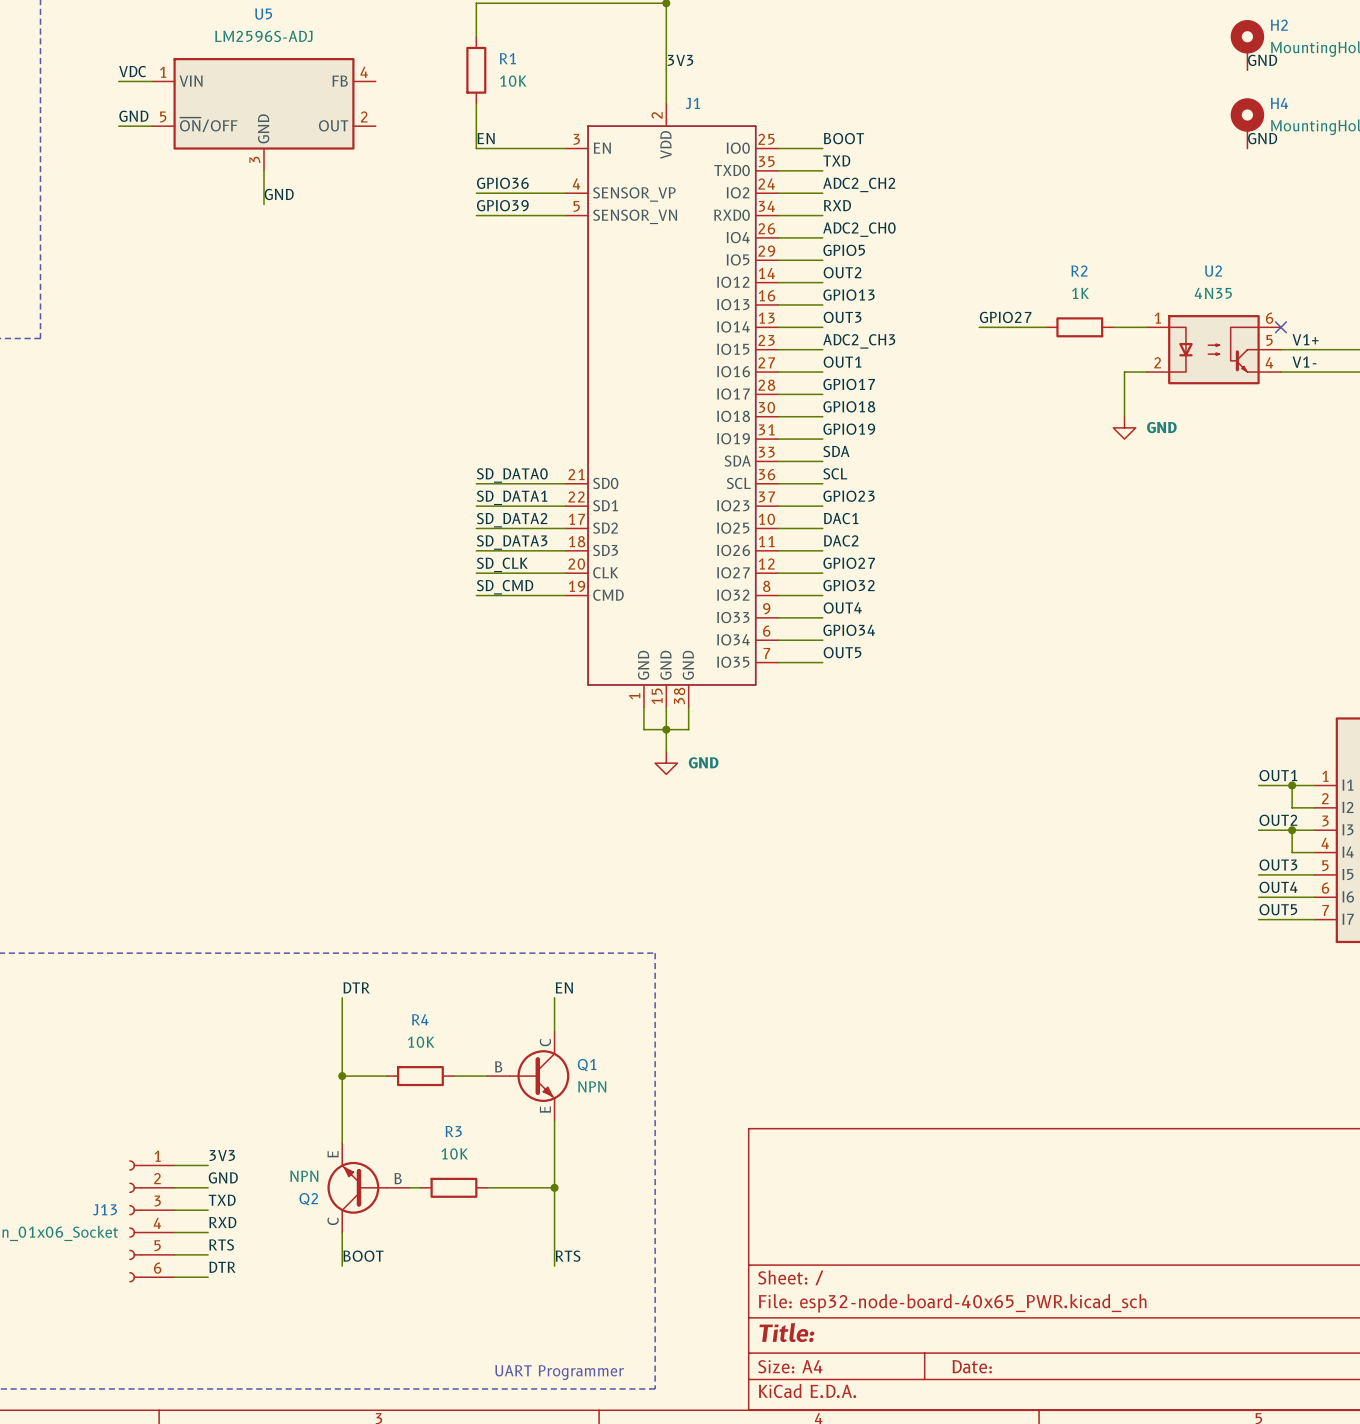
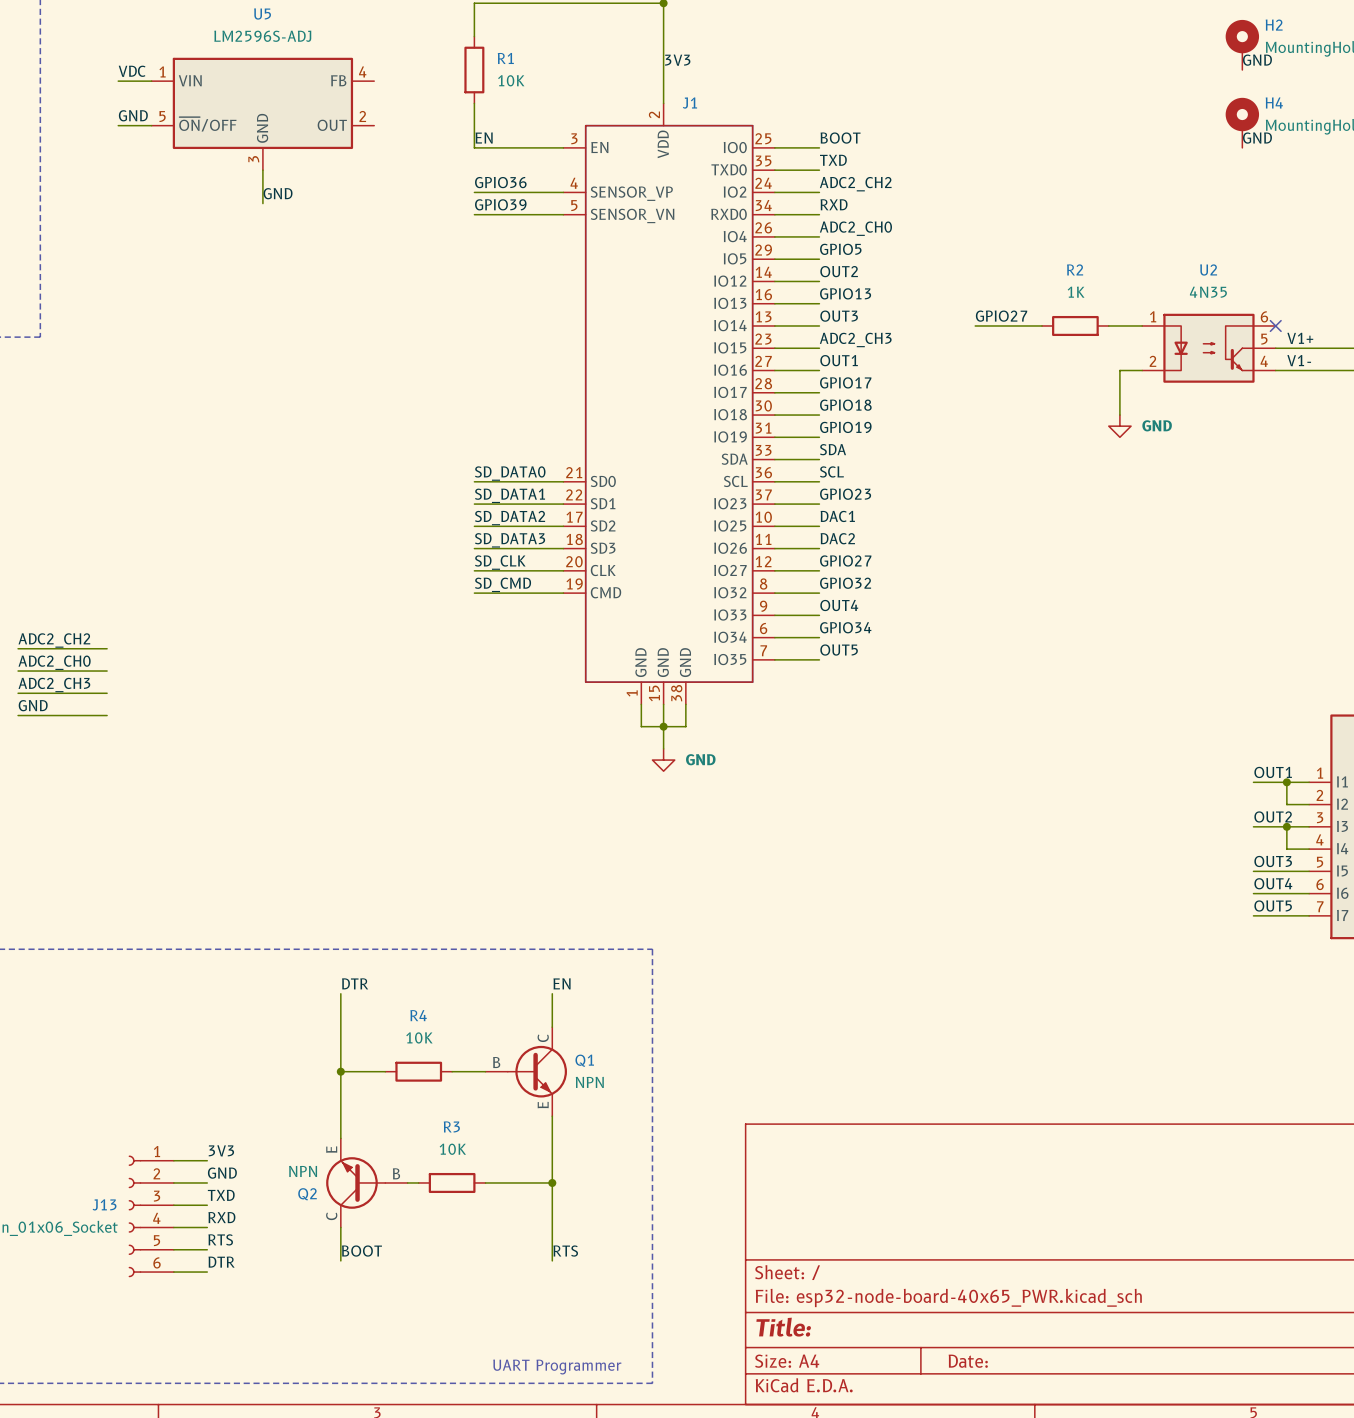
label: none -> ADC2_CH2 (54, 640)
wire: none -> (18, 648) (107, 648)
label: none -> ADC2_CH0 (54, 662)
wire: none -> (18, 671) (107, 671)
label: none -> ADC2_CH3 (54, 685)
wire: none -> (18, 693) (107, 693)
label: none -> GND (33, 705)
wire: none -> (18, 715) (107, 715)

